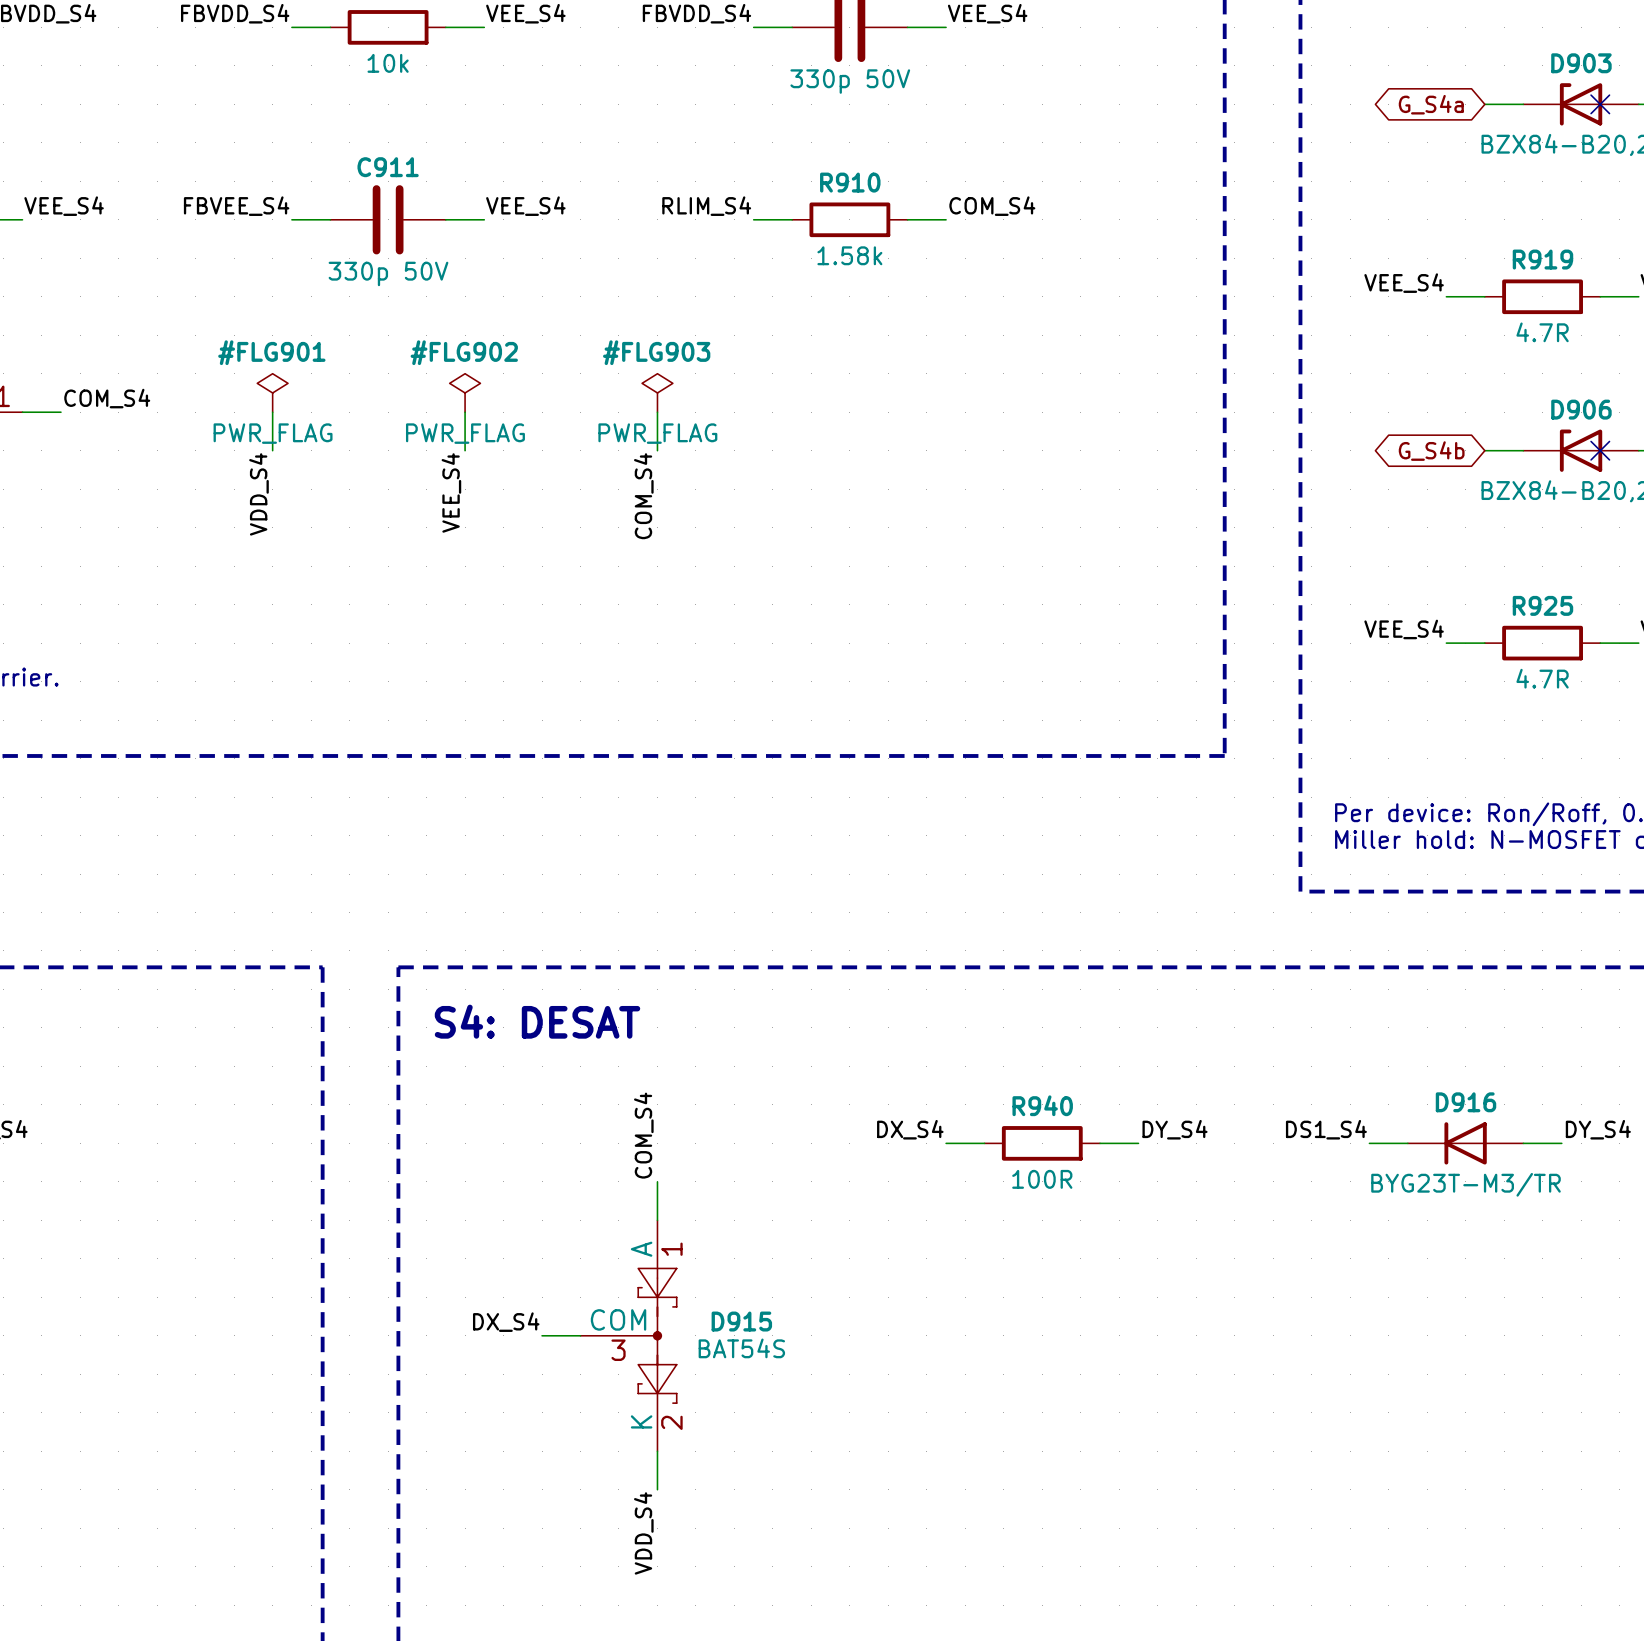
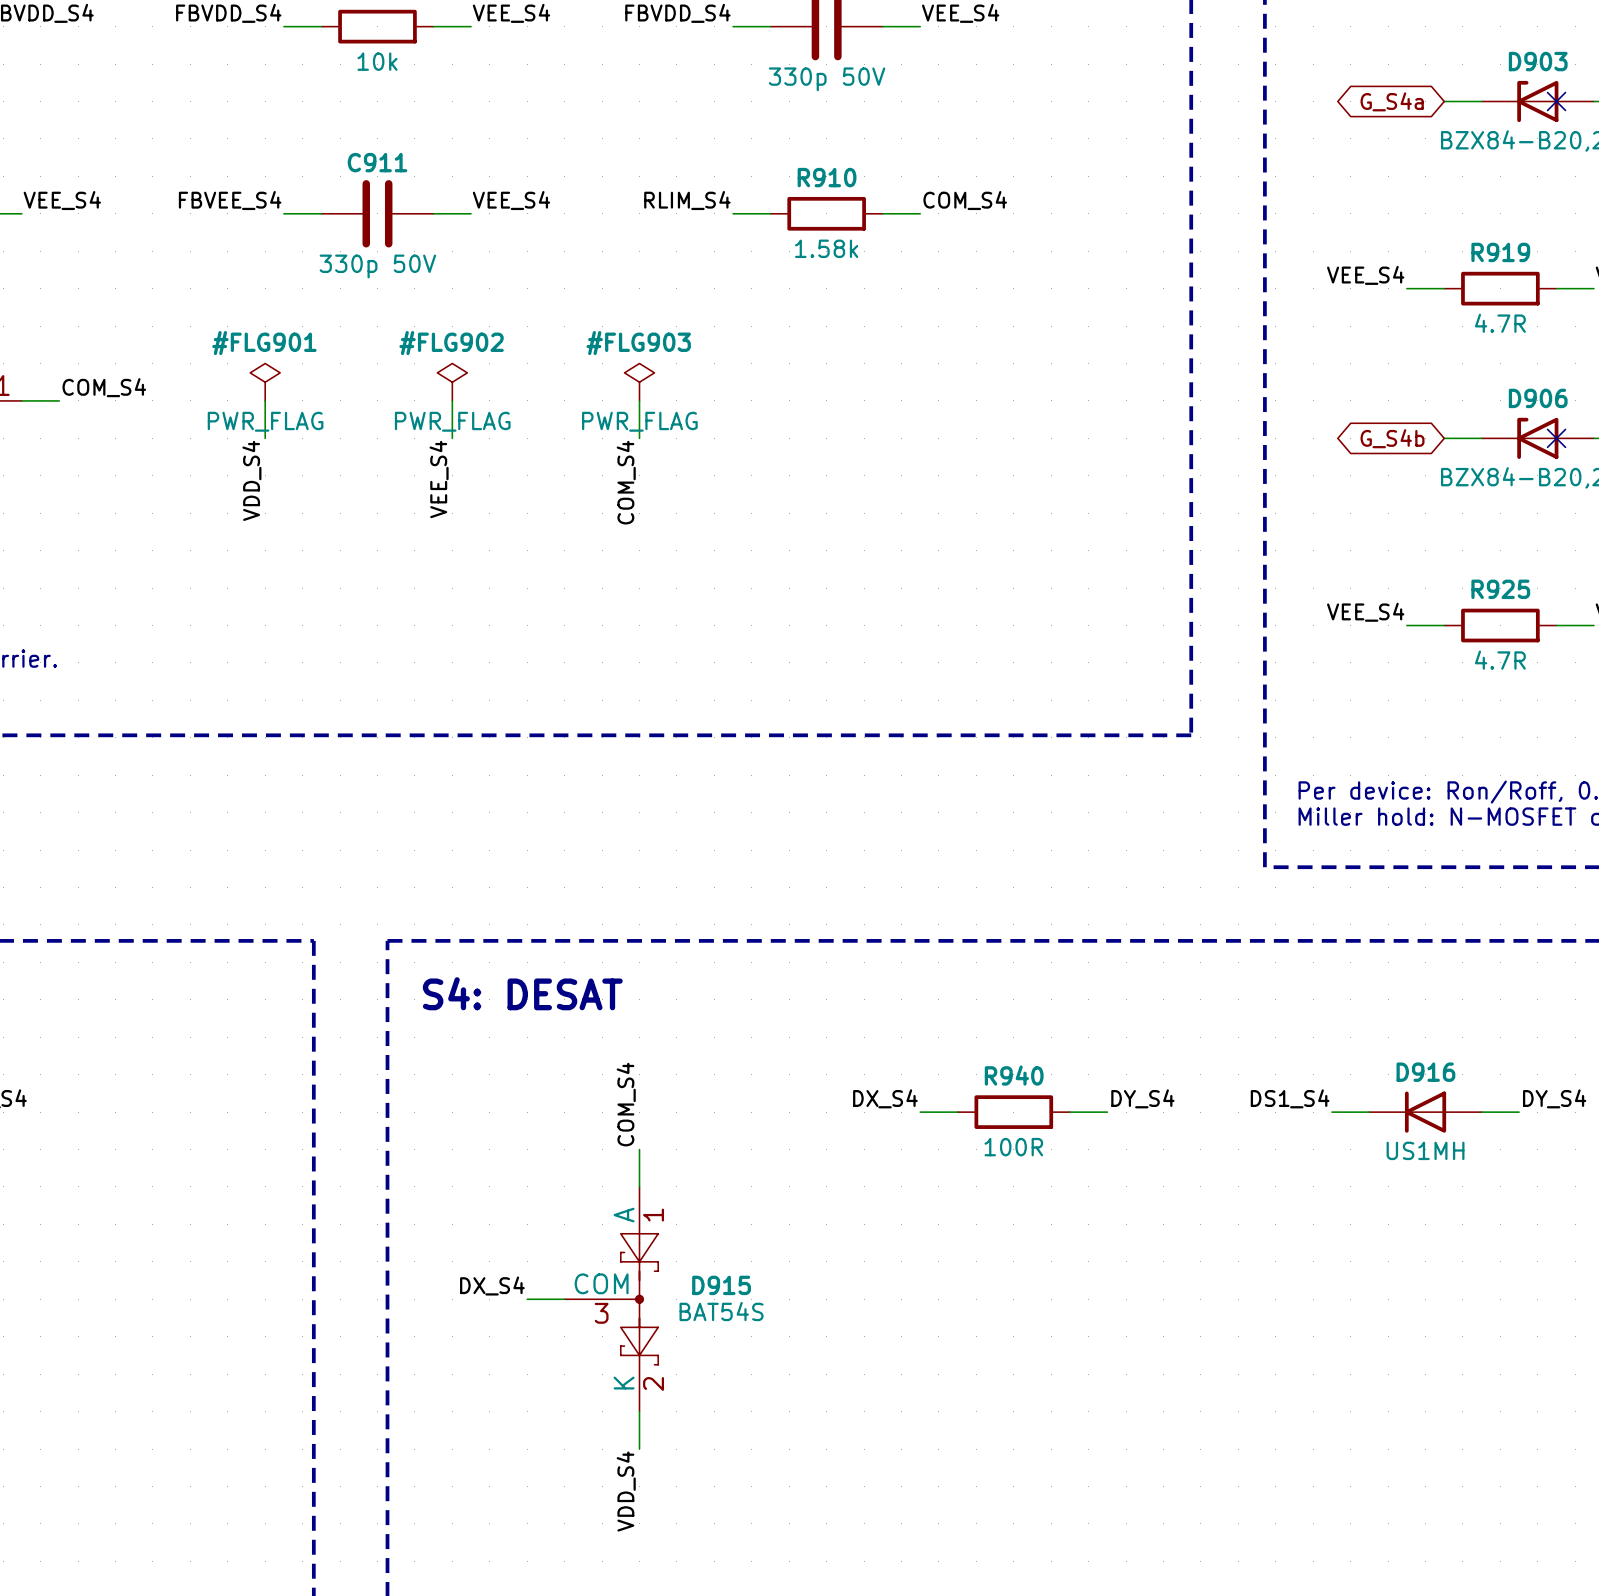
D916 value: BYG23T-M3/TR (1466, 1184) -> US1MH (1425, 1150)

